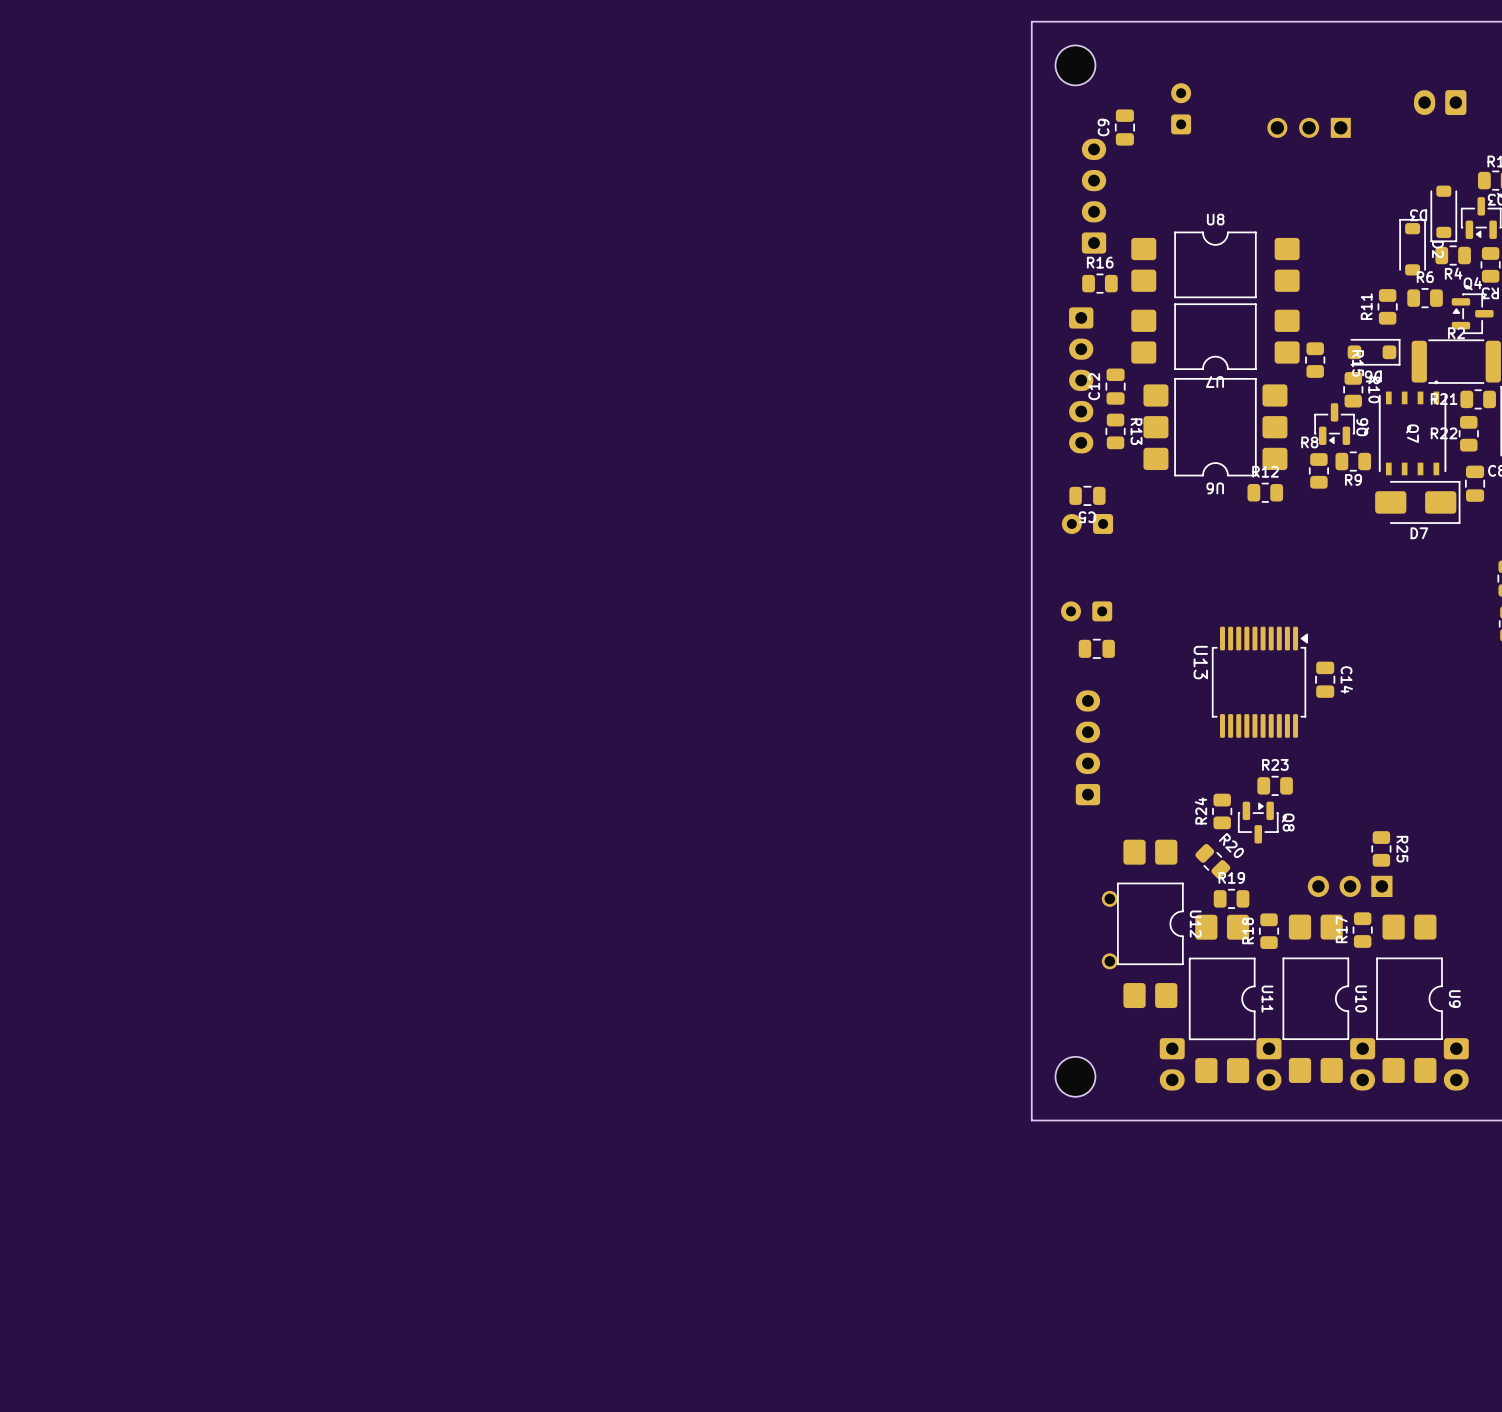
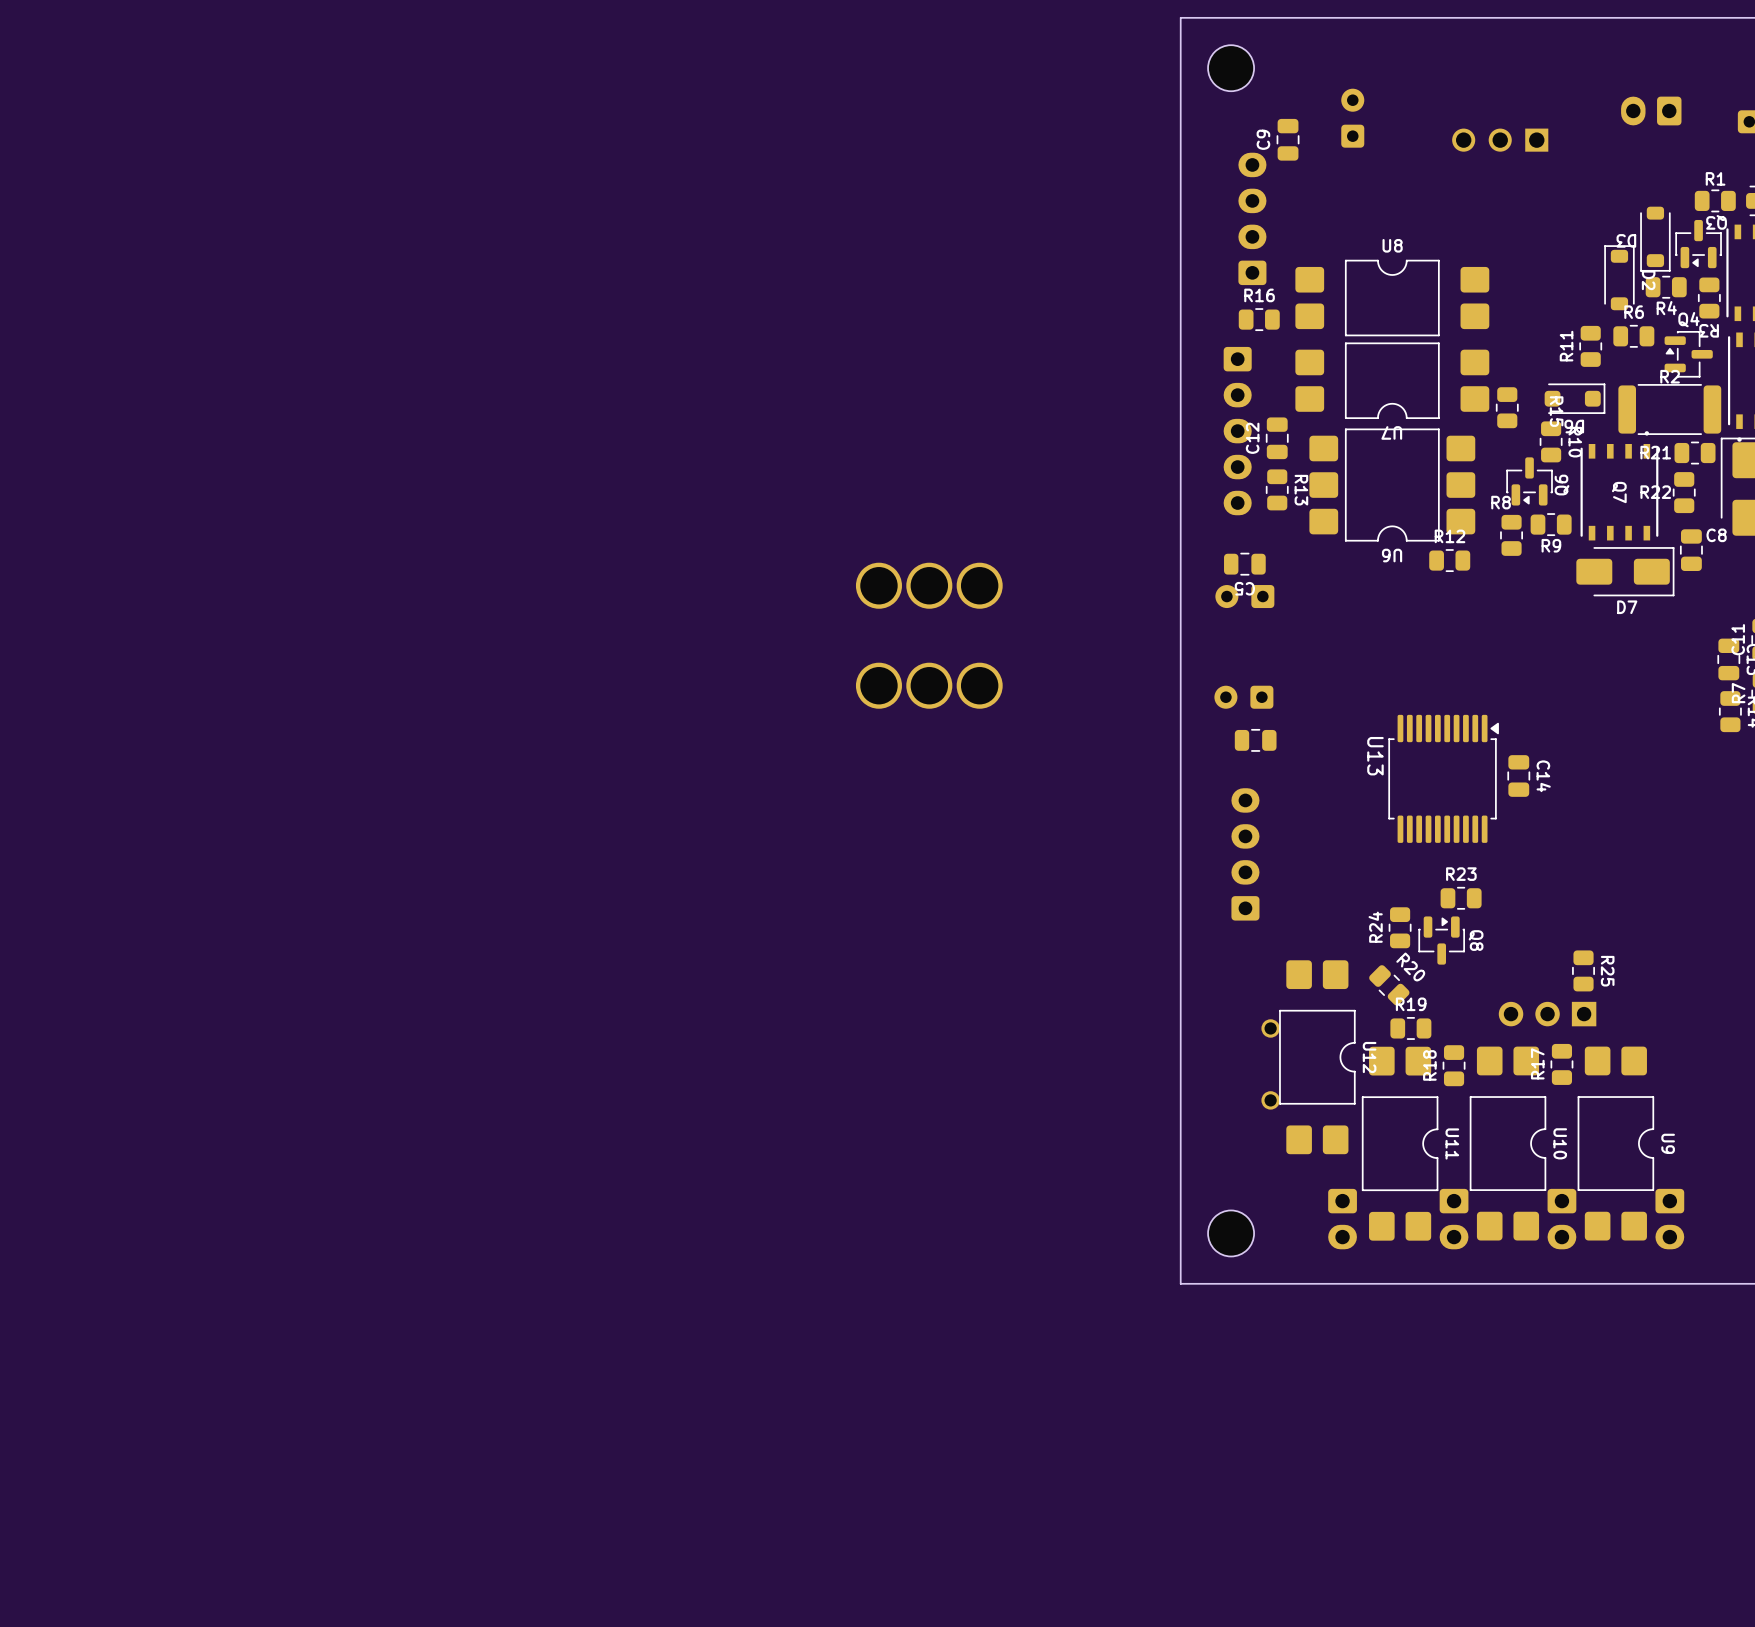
part: none -> (929, 585)
part: none -> (929, 685)

